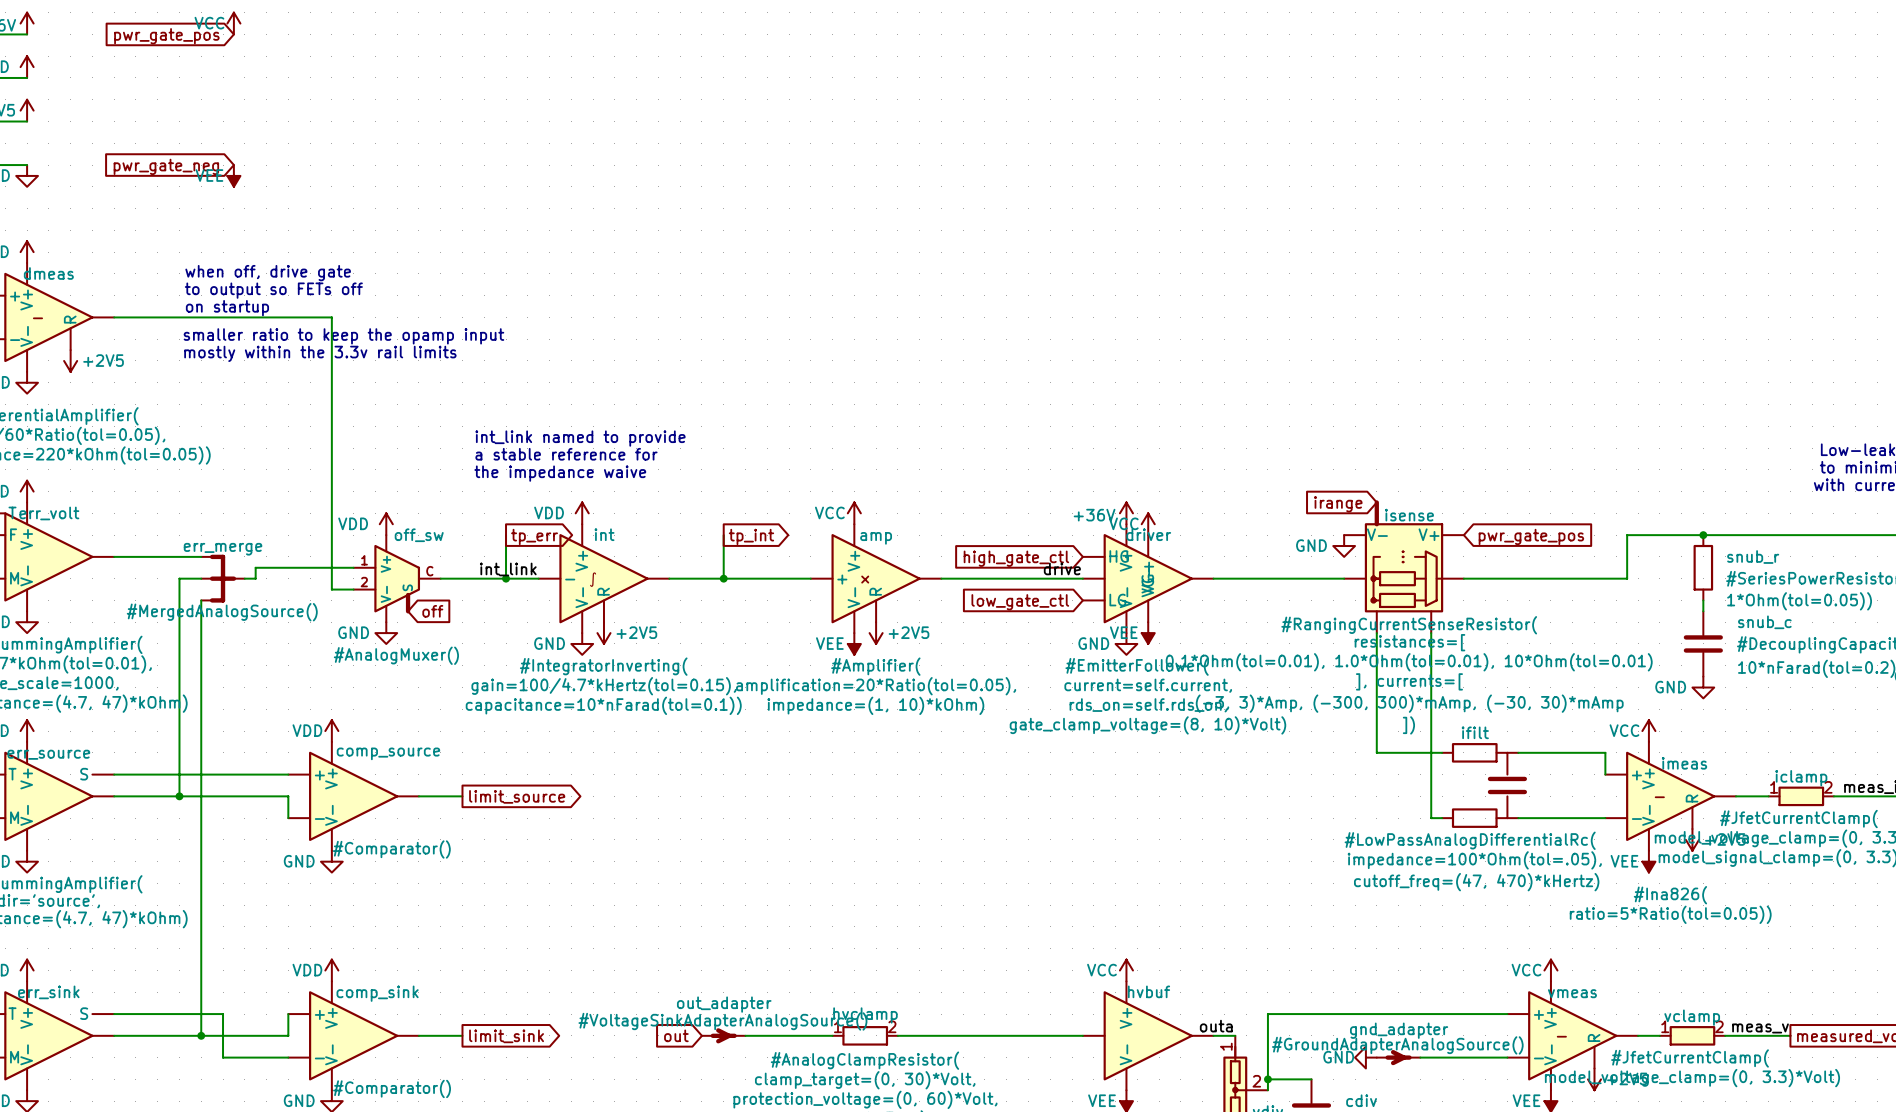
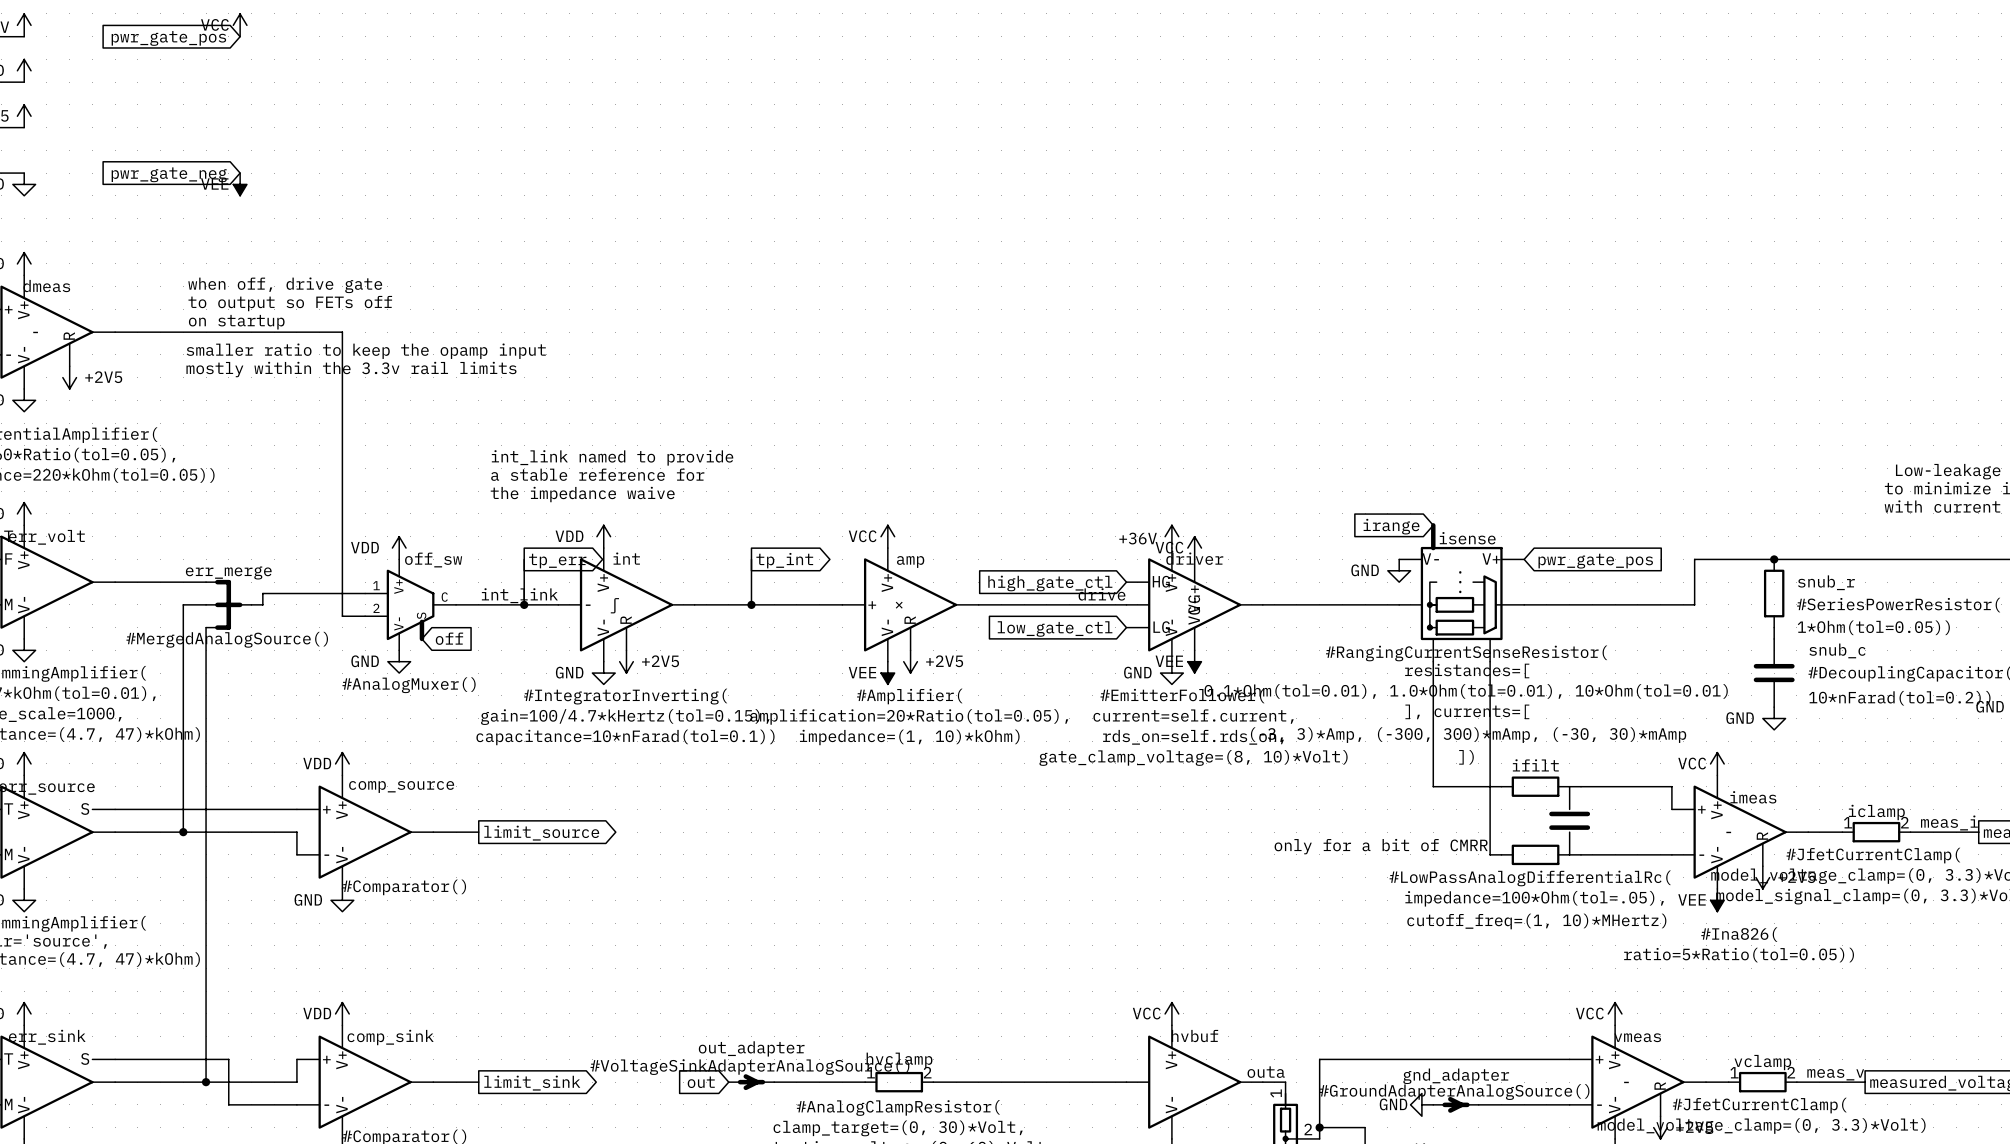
text: none -> only for a bit of CMRR (1381, 846)
ifilt text: cutoff_freq=(47, 470)*kHertz) (1476, 882) -> cutoff_freq=(1, 10)*MHertz) (1536, 921)

